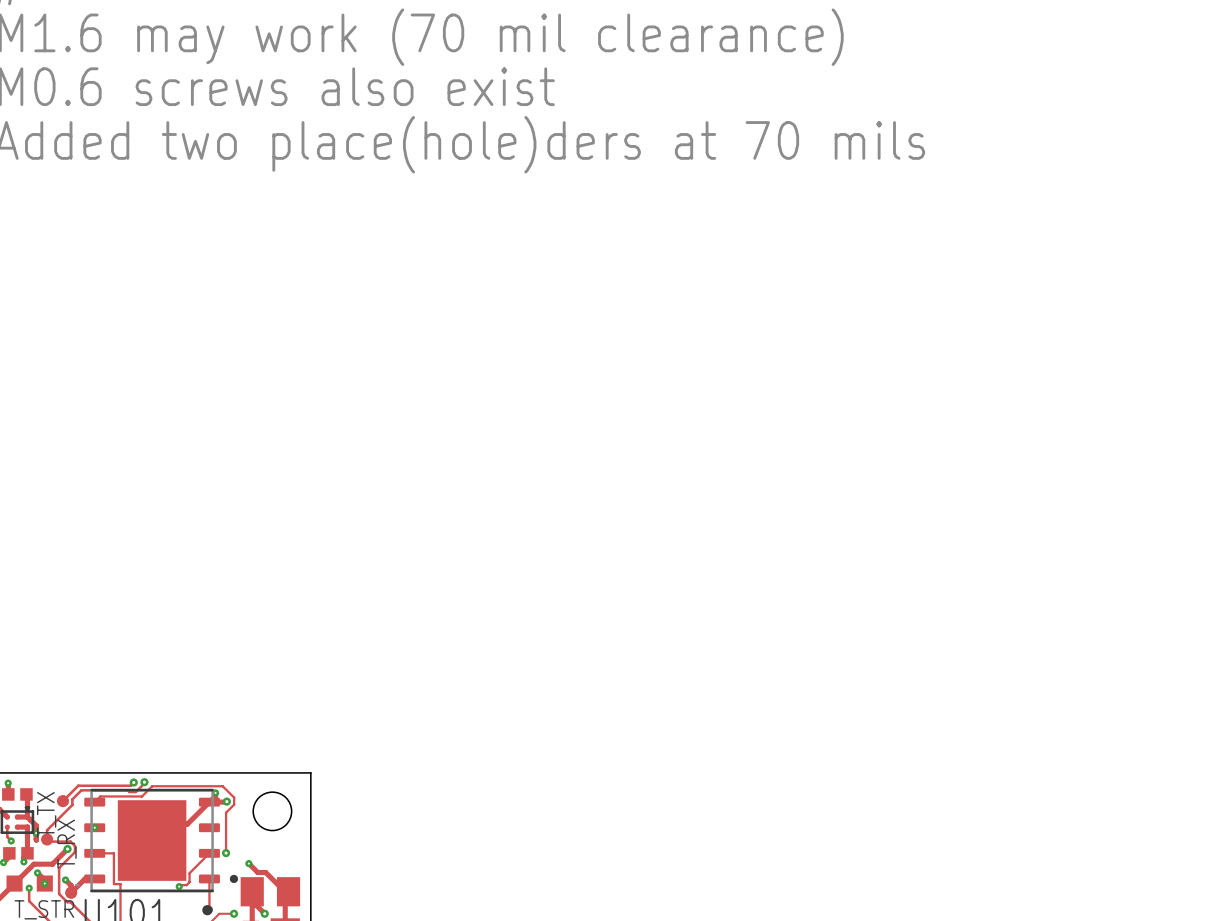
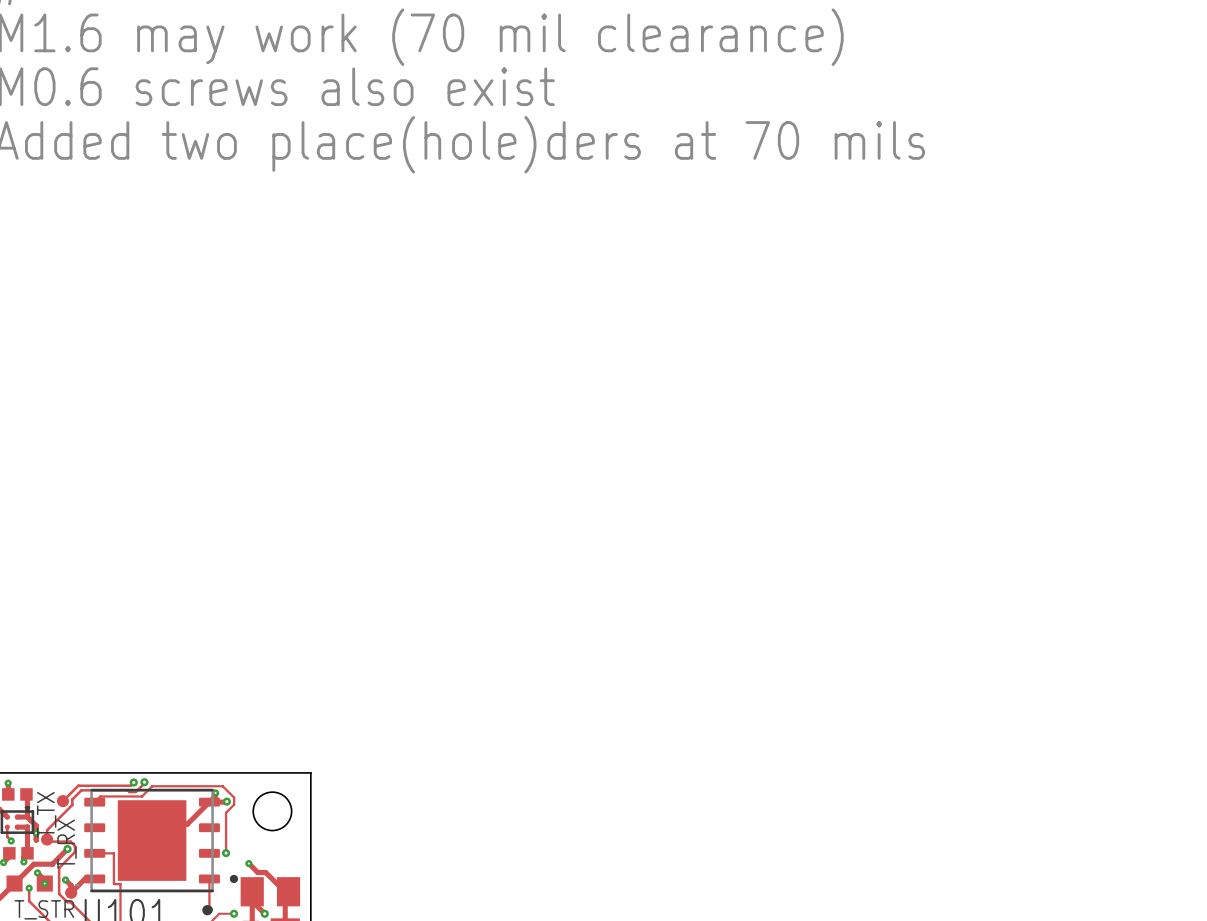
via: (94, 827) -> none
track: (209, 853) (189, 873) (189, 882) (186, 885) (179, 885) (179, 886) -> none
via: (179, 886) -> none

